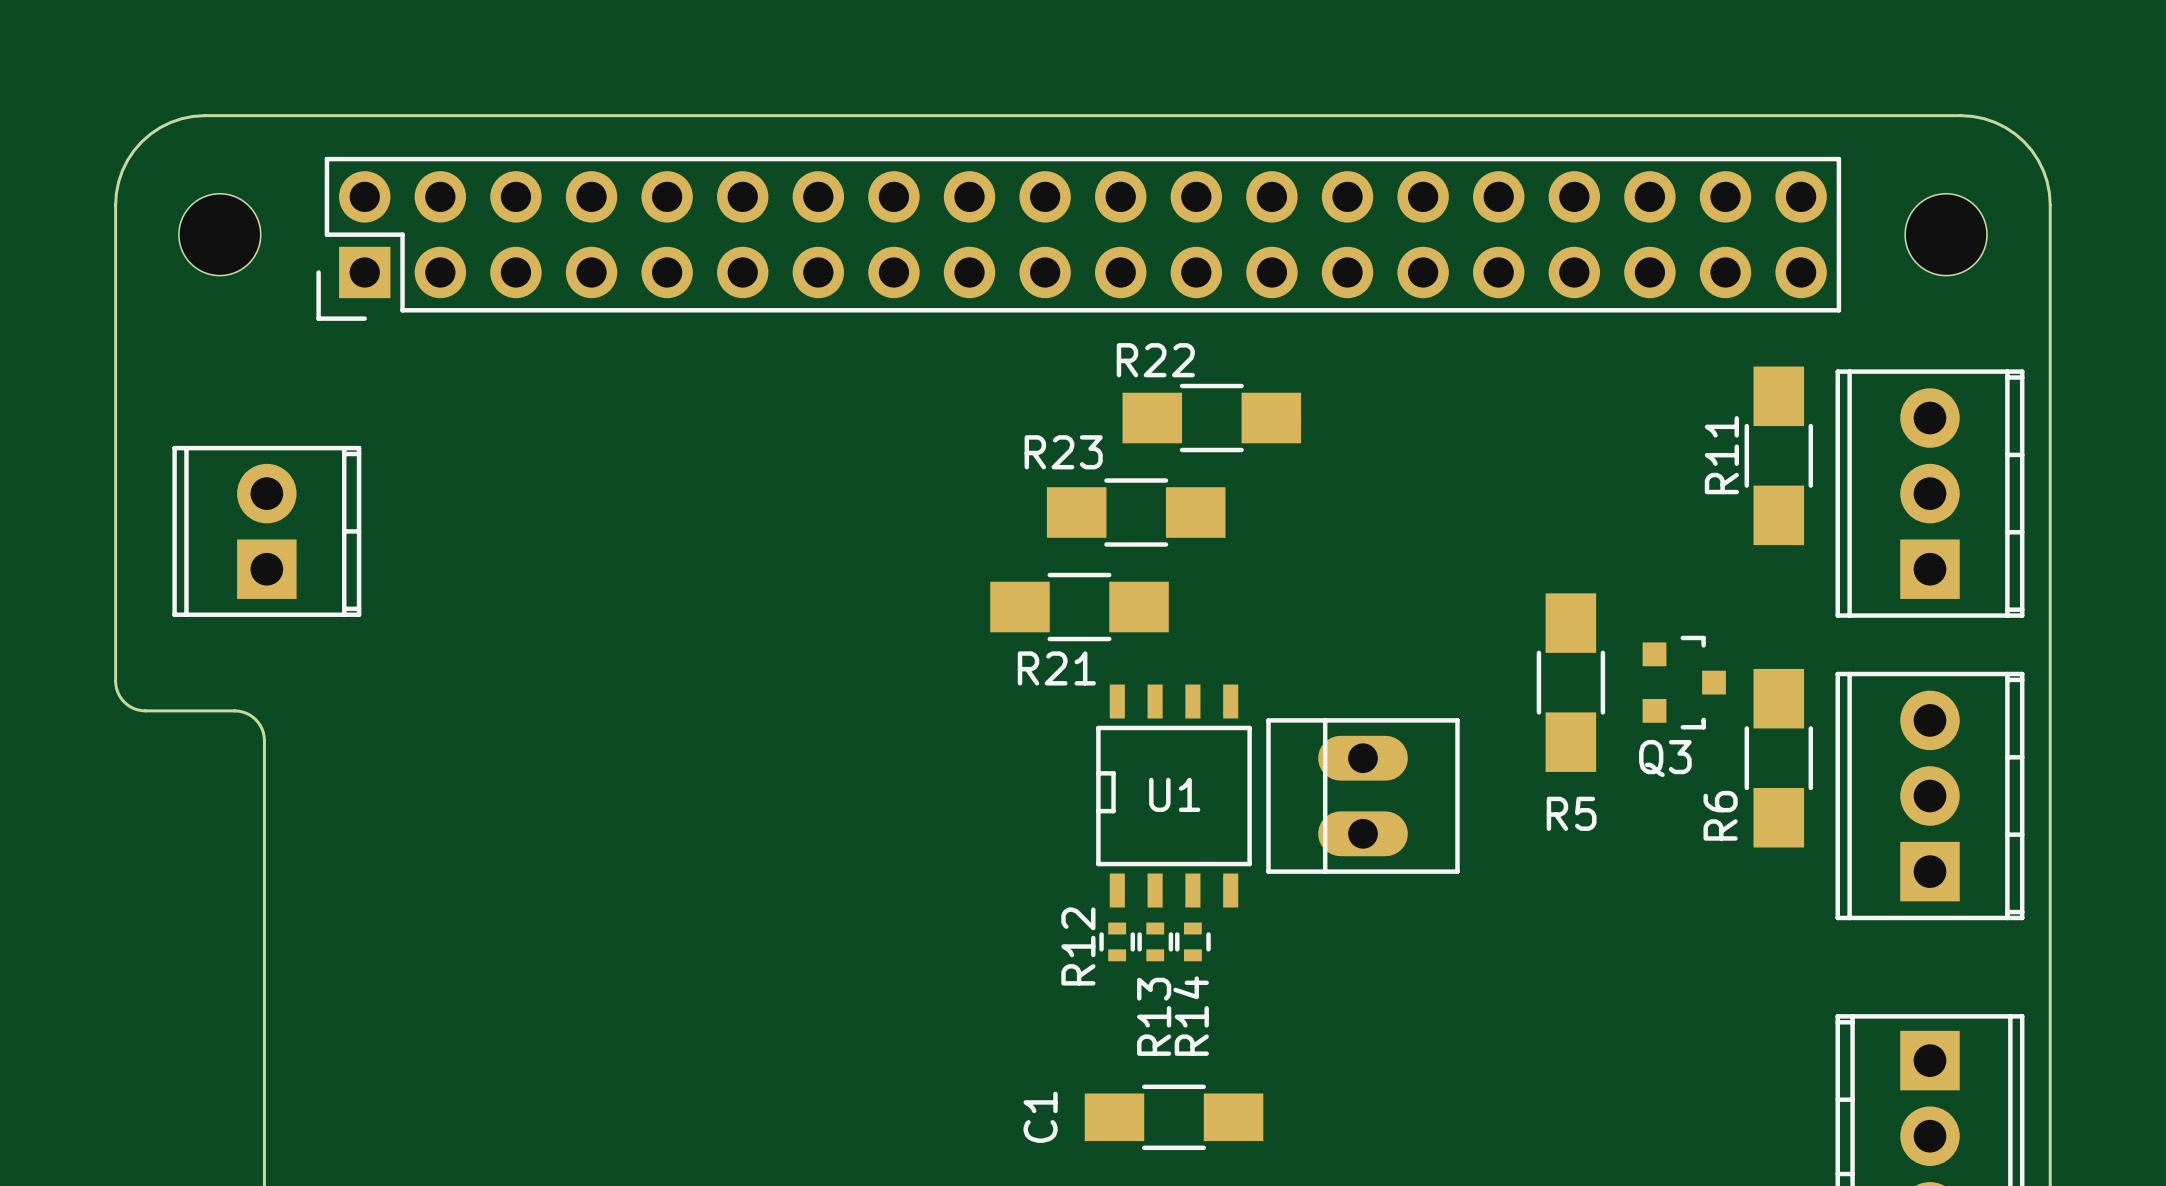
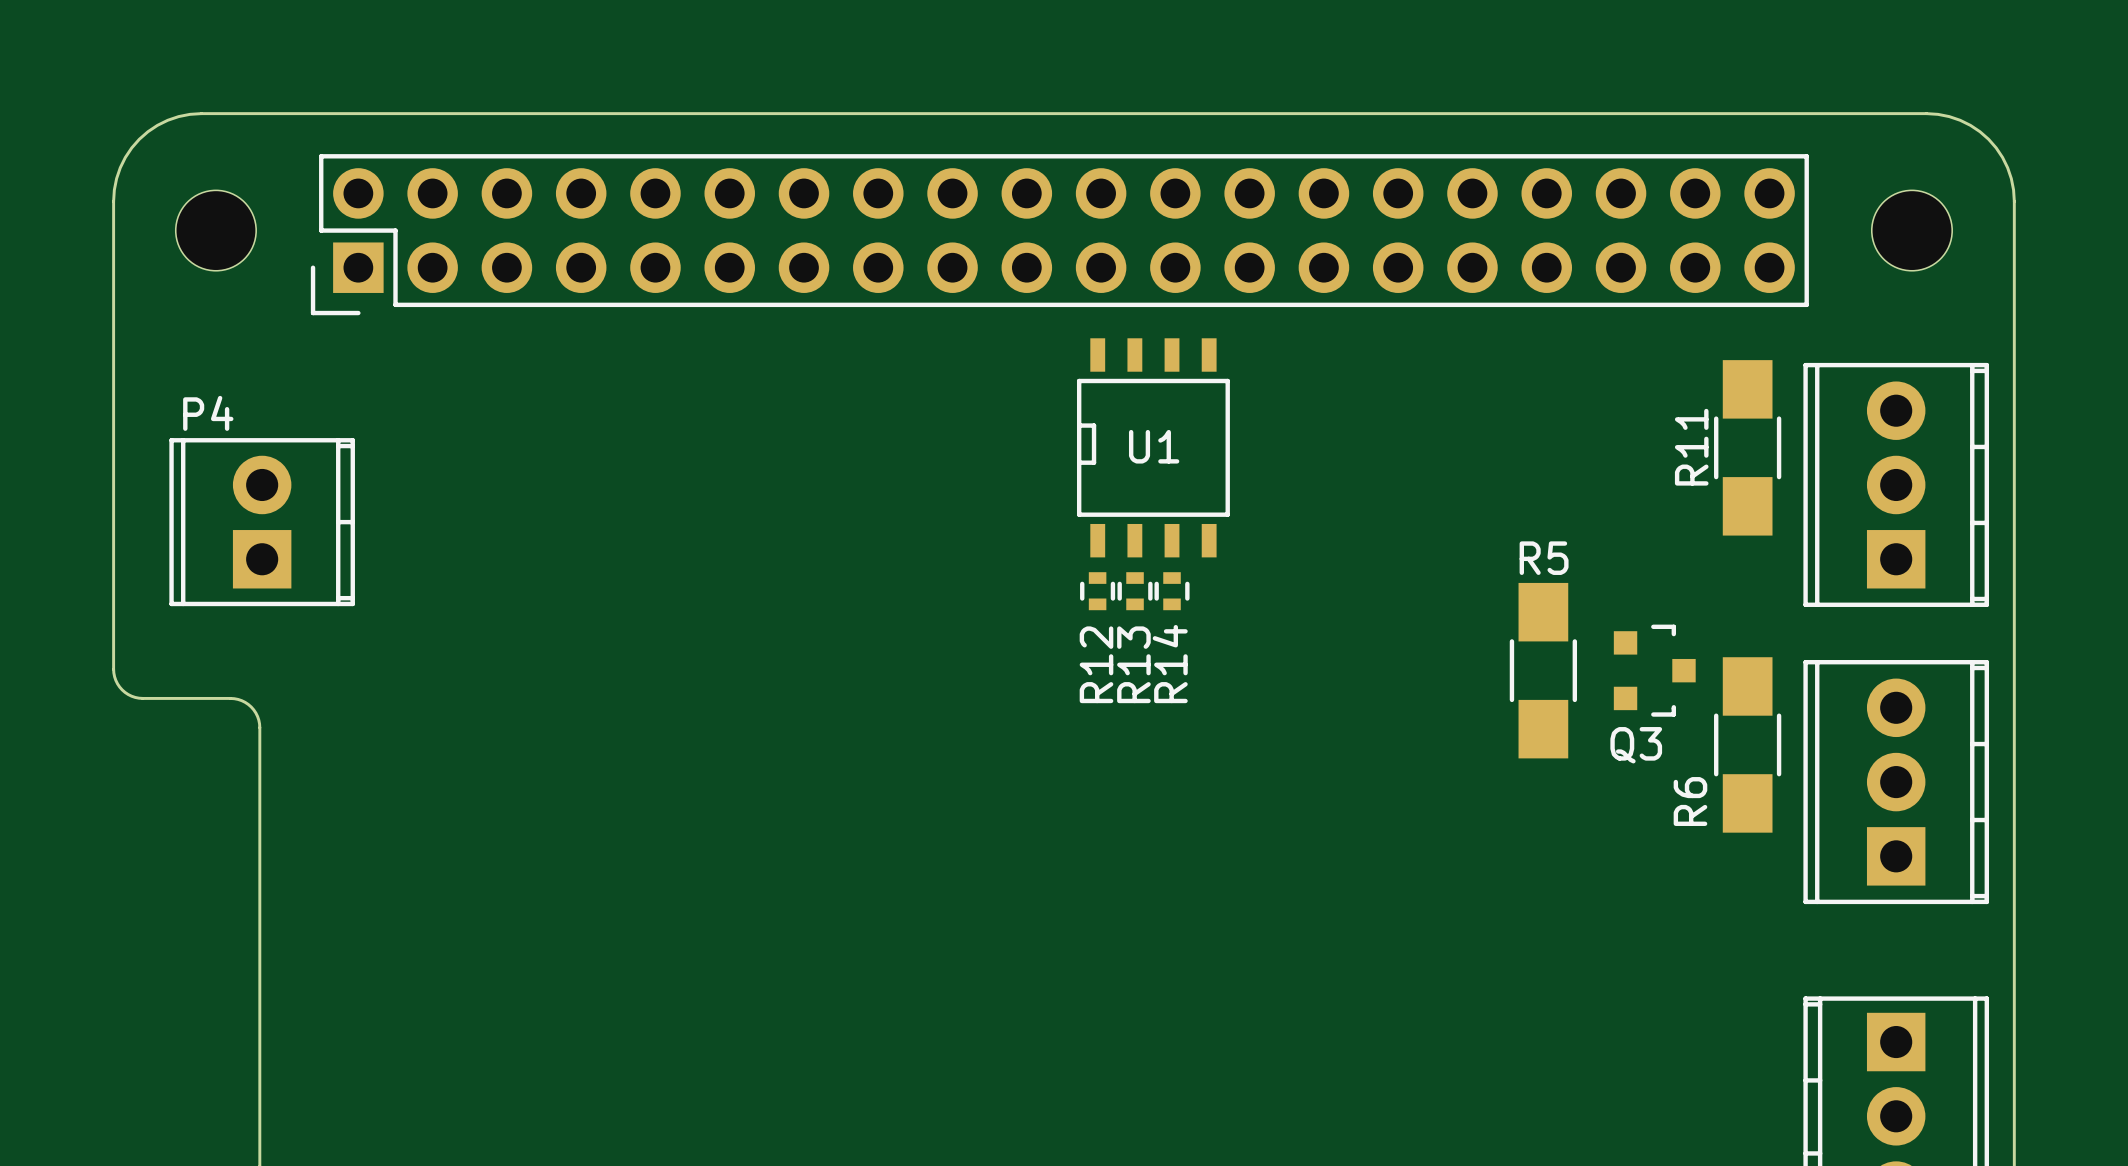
R22: (1211, 418) -> none
P4 name: none -> P4 (208, 413)
R23: (1136, 512) -> none
R21: (1079, 607) -> none
U1 position: (1174, 796) -> (1153, 447)
part: (1363, 796) -> none
R5 name position: R5 (1571, 813) -> R5 (1544, 558)
R12 position: (1117, 941) -> (1097, 591)
R13 position: (1155, 941) -> (1135, 591)
R14 position: (1192, 941) -> (1172, 591)
R12 name position: R12 (1078, 946) -> R12 (1096, 664)
C1: (1174, 1117) -> none

